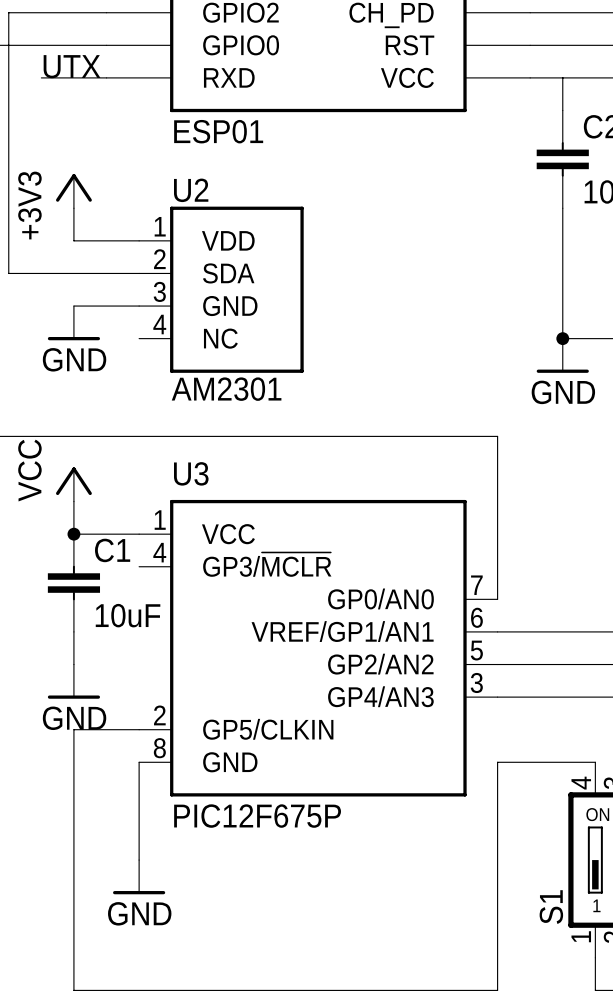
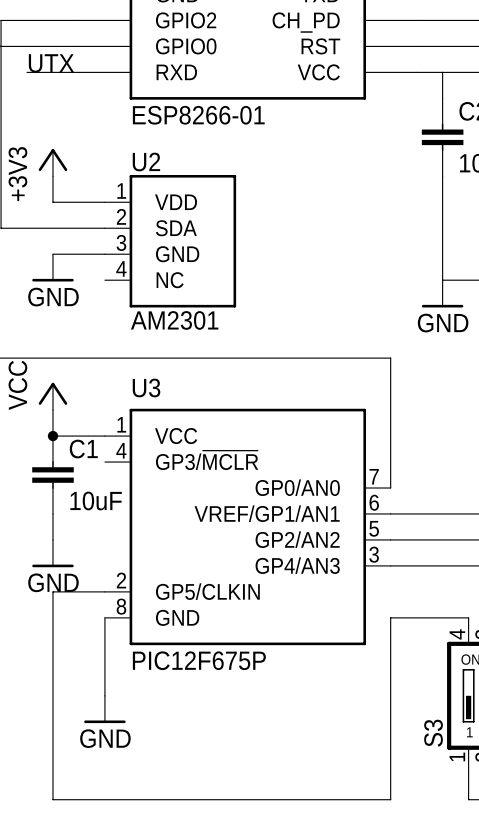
part value: ESP01 (218, 131) -> ESP8266-01 (198, 115)
junction: (562, 338) -> none
S1 name: S1 (551, 907) -> S3 (433, 733)

